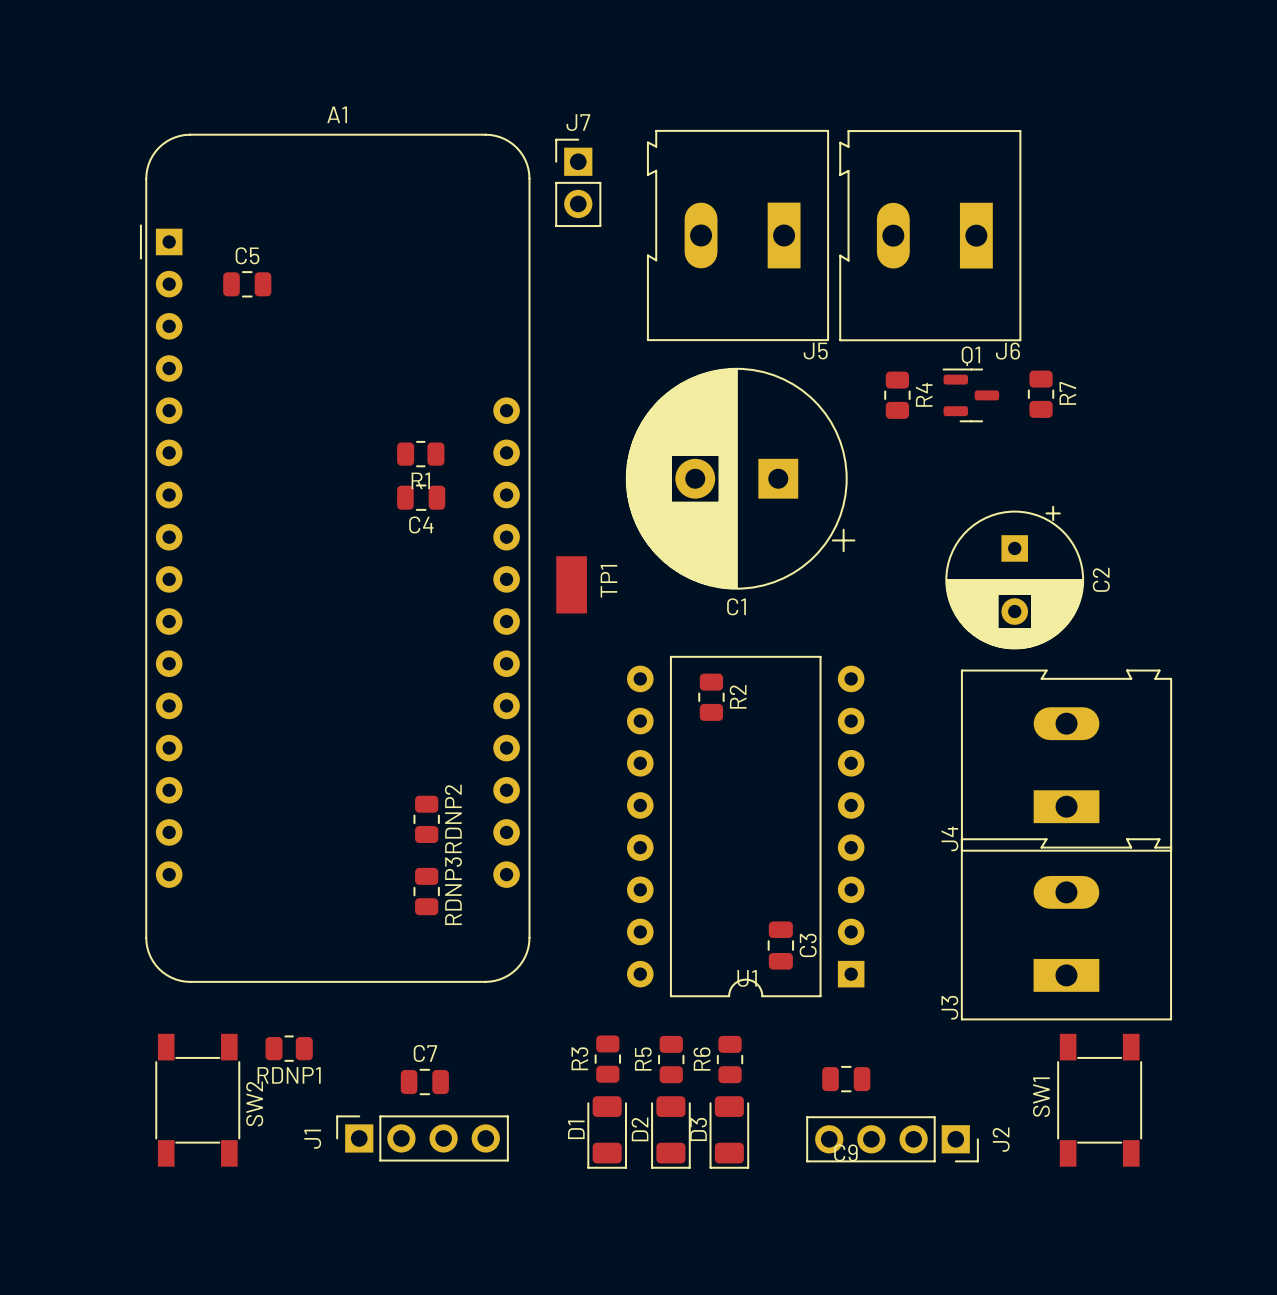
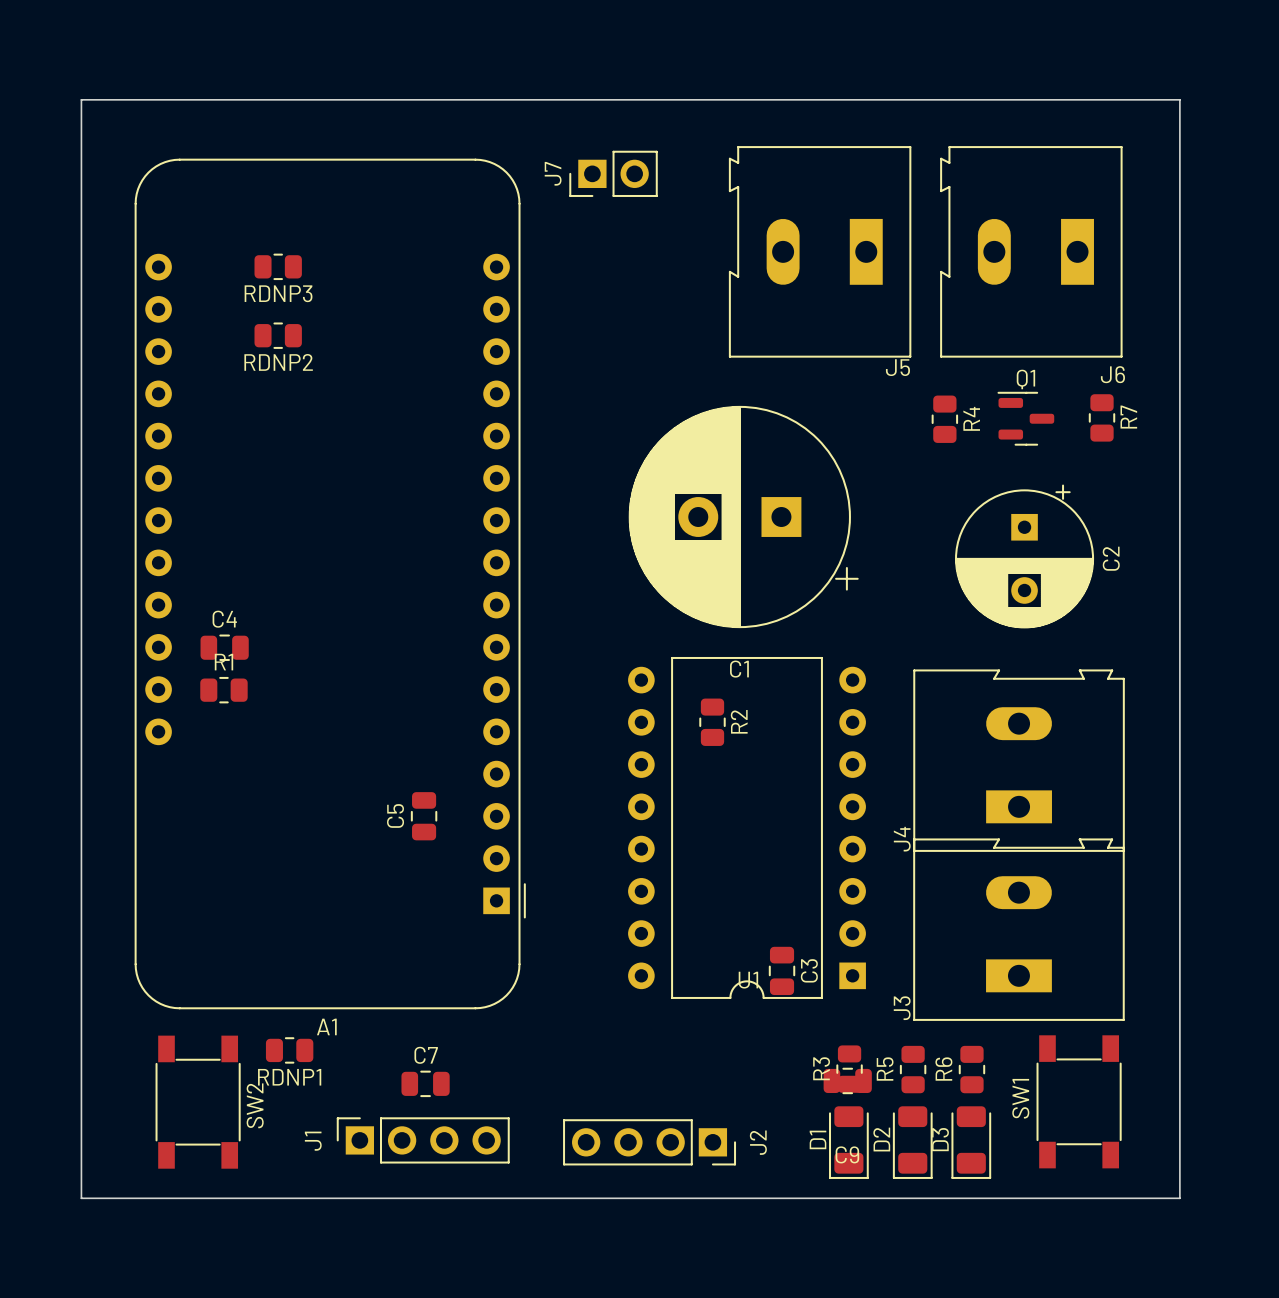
board edge: none -> (81, 99) (81, 1198) (1179, 1198) (1179, 99) (81, 99)
J7 rotation: 0° (578, 182) -> 90° counterclockwise (613, 173)
J5 position: (738, 235) -> (820, 251)
J6 position: (930, 235) -> (1031, 251)
C5 name position: C5 (247, 255) -> C5 (395, 815)
C5 rotation: 0° (247, 284) -> 90° clockwise (424, 816)
C5 position: (247, 284) -> (424, 816)
J6 name position: J6 (1008, 351) -> J6 (1112, 374)
R7 position: (1041, 394) -> (1102, 417)
R4 position: (897, 395) -> (944, 419)
Q1 position: (970, 395) -> (1025, 418)
R1 position: (420, 454) -> (223, 690)
C1 position: (740, 478) -> (743, 517)
R1 name position: R1 (420, 480) -> R1 (223, 662)
C4 position: (421, 497) -> (224, 647)
C4 name position: C4 (421, 524) -> C4 (224, 619)
A1 rotation: 0° (335, 558) -> 180° (330, 583)
C2 position: (1014, 577) -> (1024, 556)
TP1: (571, 584) -> none
C1 name position: C1 (736, 606) -> C1 (739, 669)
R2 position: (711, 697) -> (712, 722)
J4 position: (1066, 760) -> (1019, 760)
RDNP2 rotation: 0° (426, 819) -> 90° clockwise (278, 335)
RDNP2 position: (426, 819) -> (278, 335)
RDNP3 rotation: 0° (426, 891) -> 90° clockwise (278, 266)
RDNP3 position: (426, 891) -> (278, 266)
J3 position: (1066, 929) -> (1018, 929)
C3 position: (780, 945) -> (782, 970)
R3 position: (607, 1059) -> (849, 1069)
R5 position: (671, 1059) -> (913, 1069)
R6 position: (730, 1059) -> (971, 1069)
SW1 position: (1099, 1100) -> (1079, 1101)
D1 position: (607, 1132) -> (848, 1142)
D2 position: (670, 1132) -> (912, 1142)
D3 position: (729, 1132) -> (971, 1142)
J2 position: (892, 1139) -> (649, 1142)

